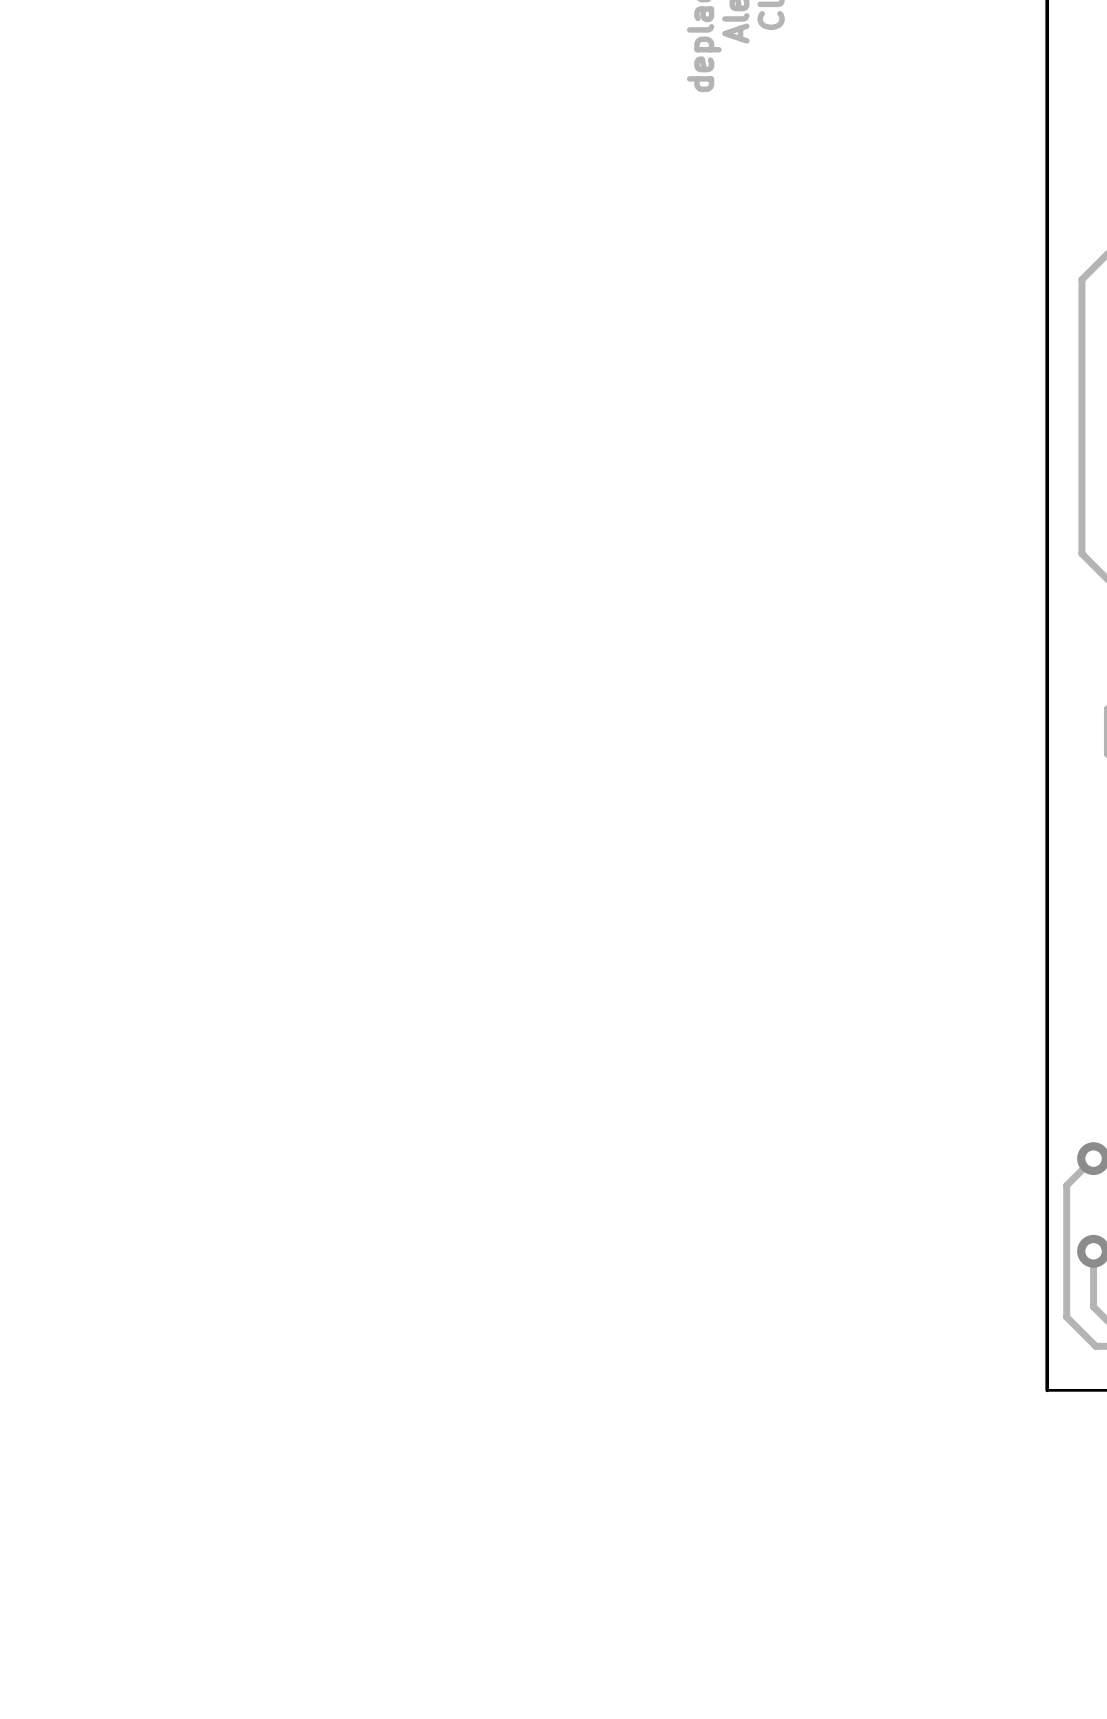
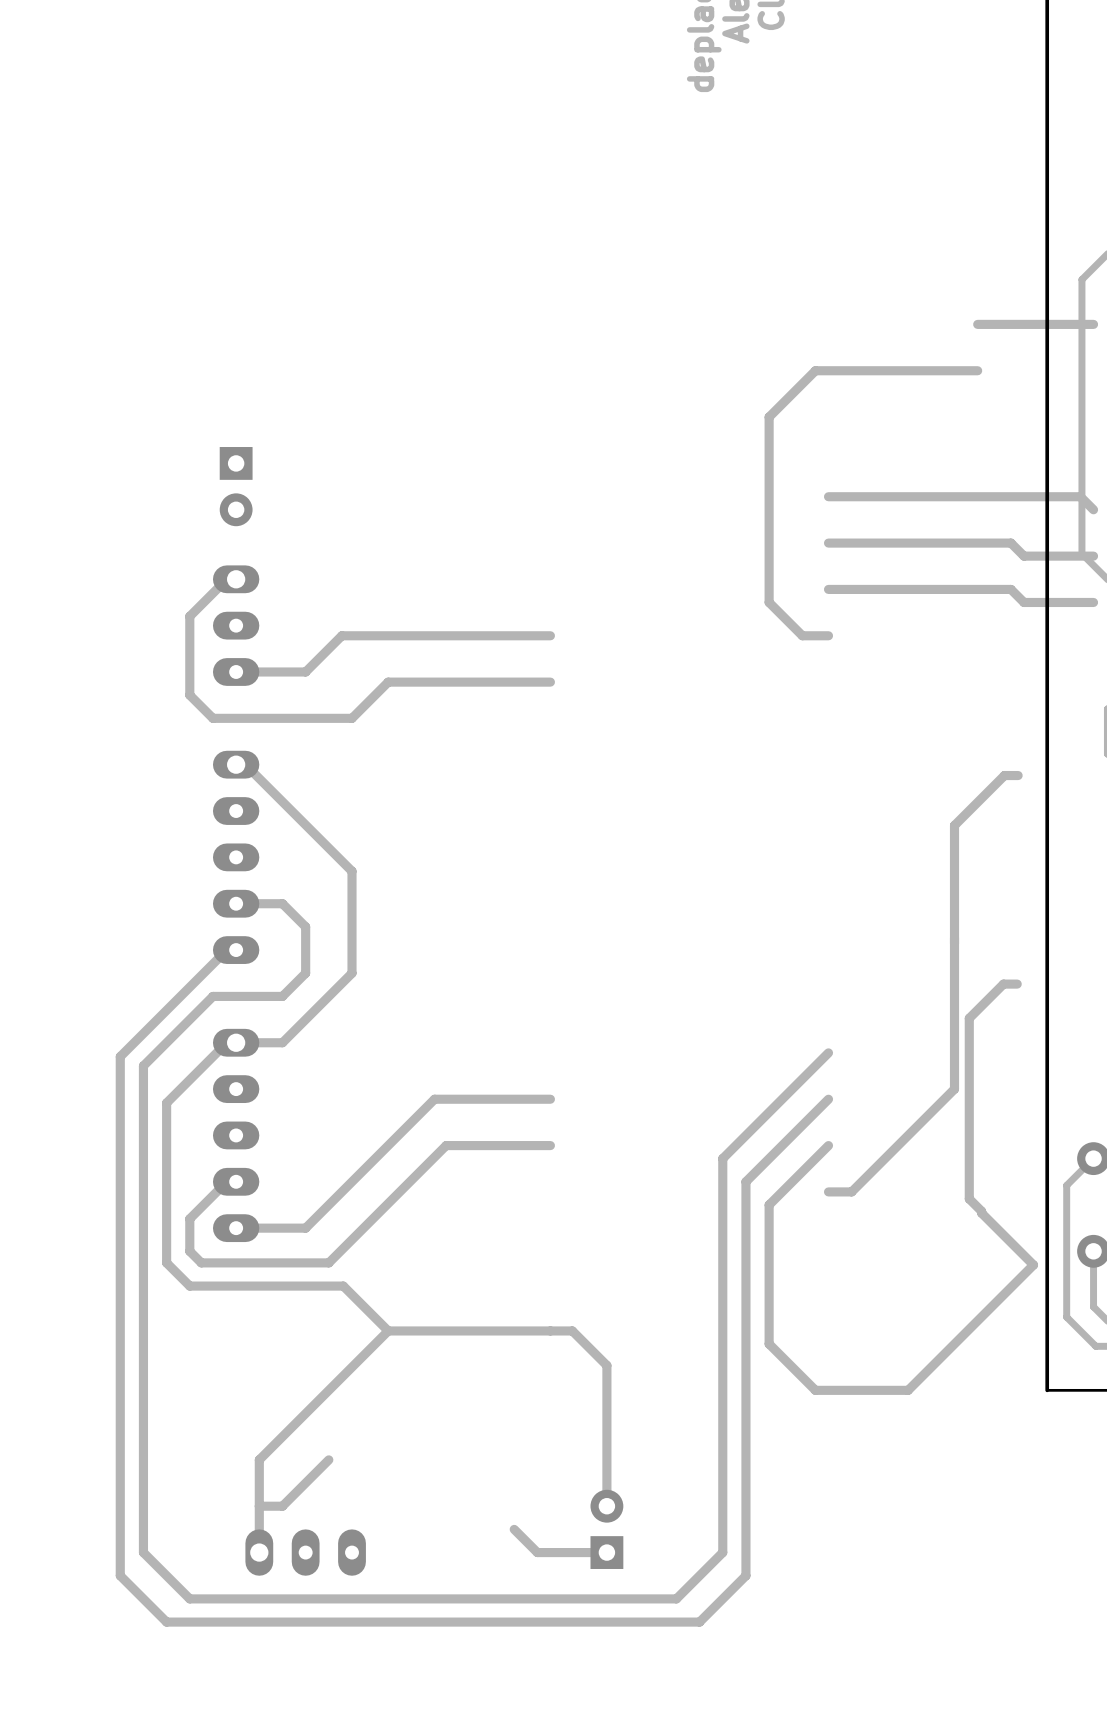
track: none -> (1093, 324) (977, 324)
track: none -> (977, 370) (815, 370) (769, 417) (769, 602) (802, 635) (828, 635)
part: none -> (236, 486)
track: none -> (828, 496) (1080, 496) (1093, 509)
track: none -> (828, 543) (1010, 543) (1024, 556) (1093, 556)
track: none -> (236, 579) (226, 579) (189, 616) (189, 695) (212, 718) (352, 718) (388, 682) (550, 682)
track: none -> (828, 589) (1010, 589) (1024, 602) (1093, 602)
part: none -> (236, 625)
track: none -> (550, 635) (341, 635) (305, 671) (226, 671)
track: none -> (236, 764) (245, 764) (352, 871) (352, 973) (282, 1042) (226, 1042) (166, 1103) (166, 1262) (189, 1286) (343, 1286) (388, 1330)
track: none -> (1018, 775) (1004, 775) (954, 825) (954, 1089) (851, 1191) (828, 1191)
part: none -> (236, 857)
track: none -> (226, 903) (282, 903) (305, 926) (305, 973) (282, 996) (212, 996) (143, 1065) (143, 1552) (189, 1598) (676, 1598) (722, 1552) (722, 1158) (828, 1052)
track: none -> (236, 950) (226, 950) (120, 1056) (120, 1575) (166, 1622) (699, 1622) (745, 1575) (745, 1181) (828, 1099)
track: none -> (1017, 984) (1003, 984) (969, 1018) (969, 1198) (1033, 1265) (908, 1390) (815, 1390) (769, 1344) (769, 1204) (828, 1145)
track: none -> (550, 1099) (434, 1099) (305, 1228) (236, 1228)
part: none -> (236, 1135)
track: none -> (550, 1145) (446, 1145) (328, 1262) (201, 1262) (189, 1251) (189, 1218) (226, 1181) (236, 1181)
track: none -> (388, 1330) (572, 1330) (606, 1365) (606, 1506)
track: none -> (388, 1330) (259, 1459) (259, 1552)
track: none -> (328, 1459) (282, 1506) (259, 1506)
track: none -> (514, 1529) (537, 1552) (606, 1552)
part: none -> (606, 1529)
part: none -> (305, 1552)

